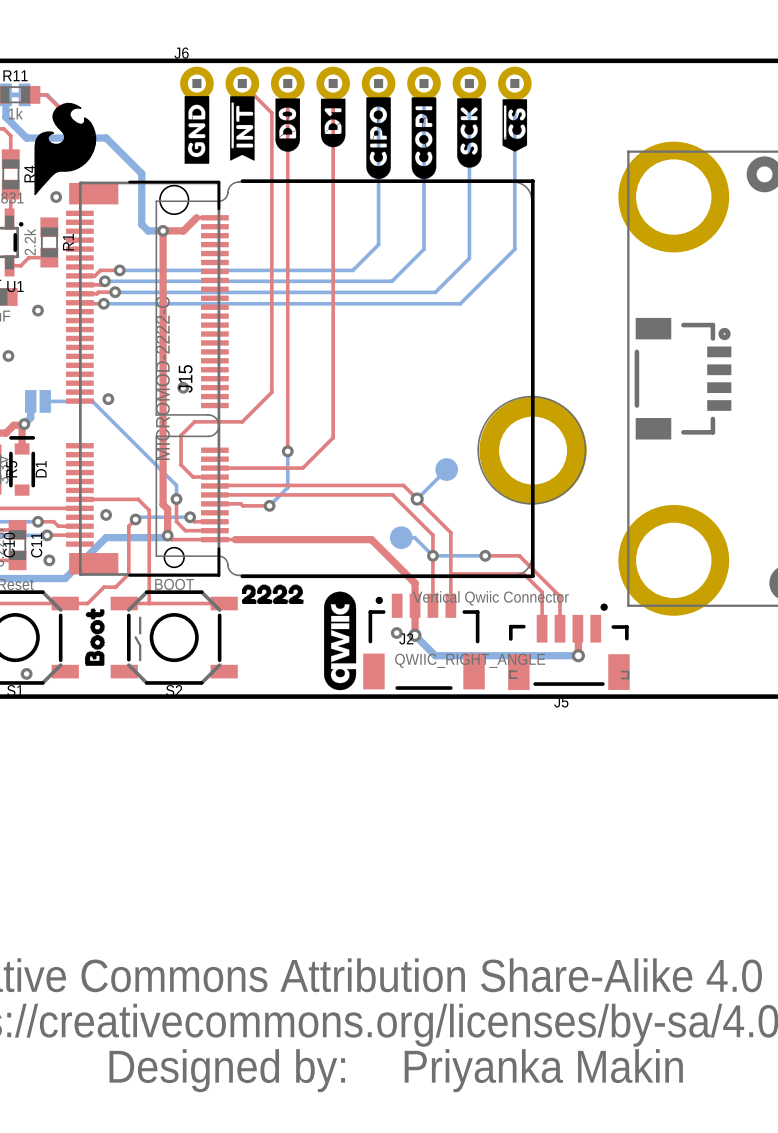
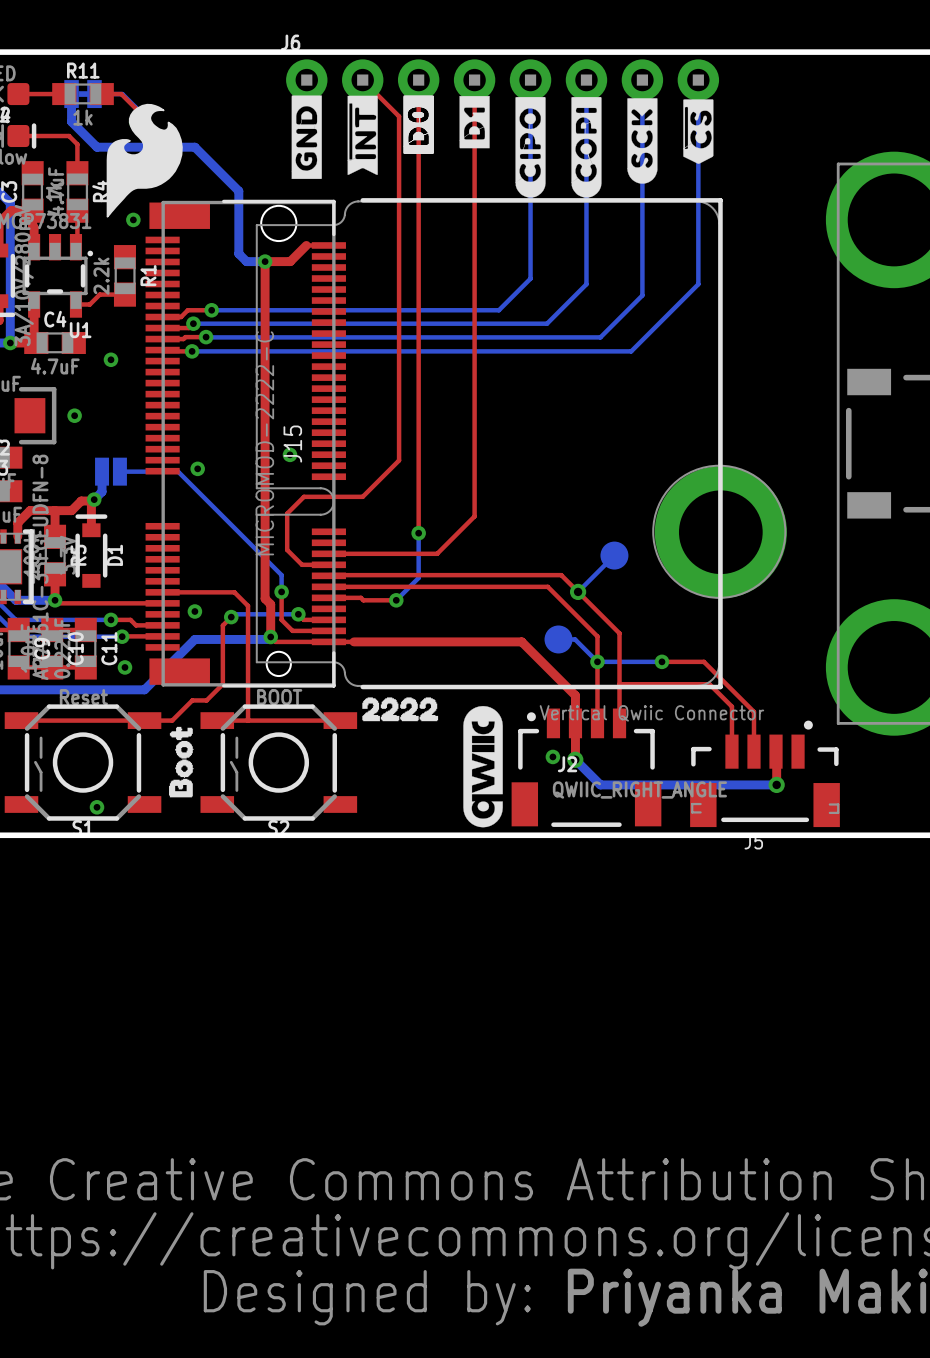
drawing shape: [275, 98, 301, 152] -> [403, 95, 434, 154]
drawing shape: [320, 98, 346, 148] -> [459, 96, 490, 149]

